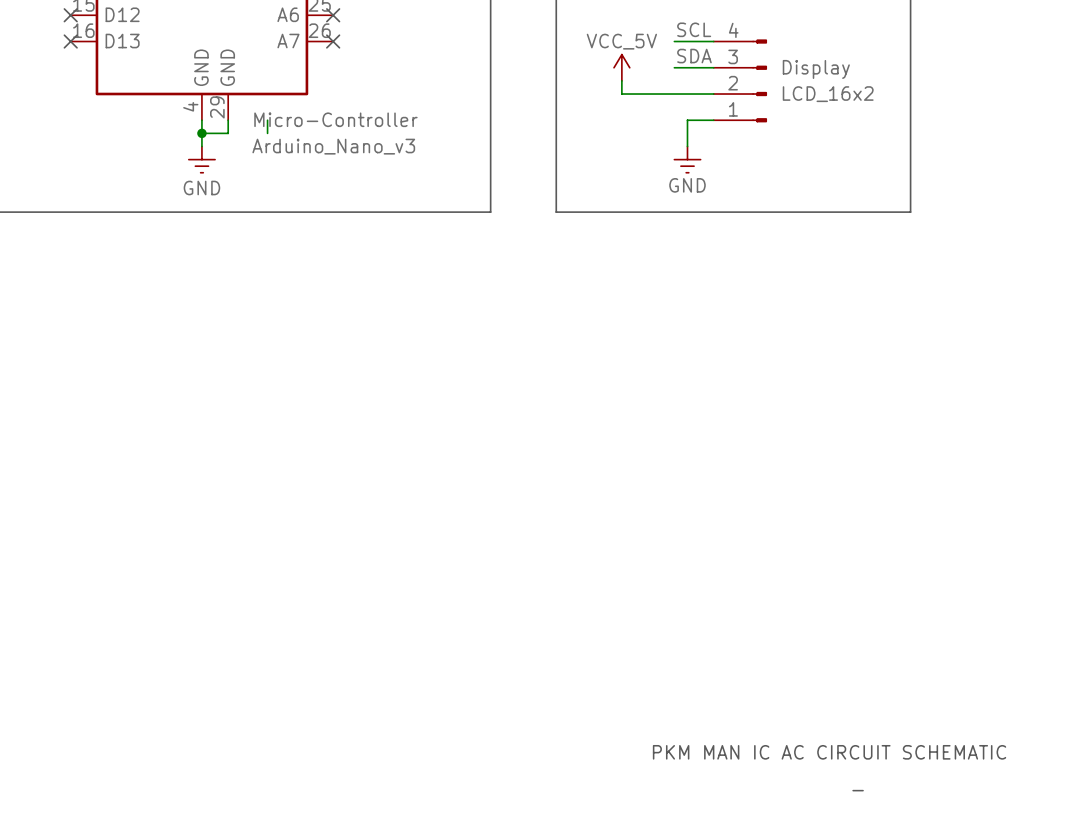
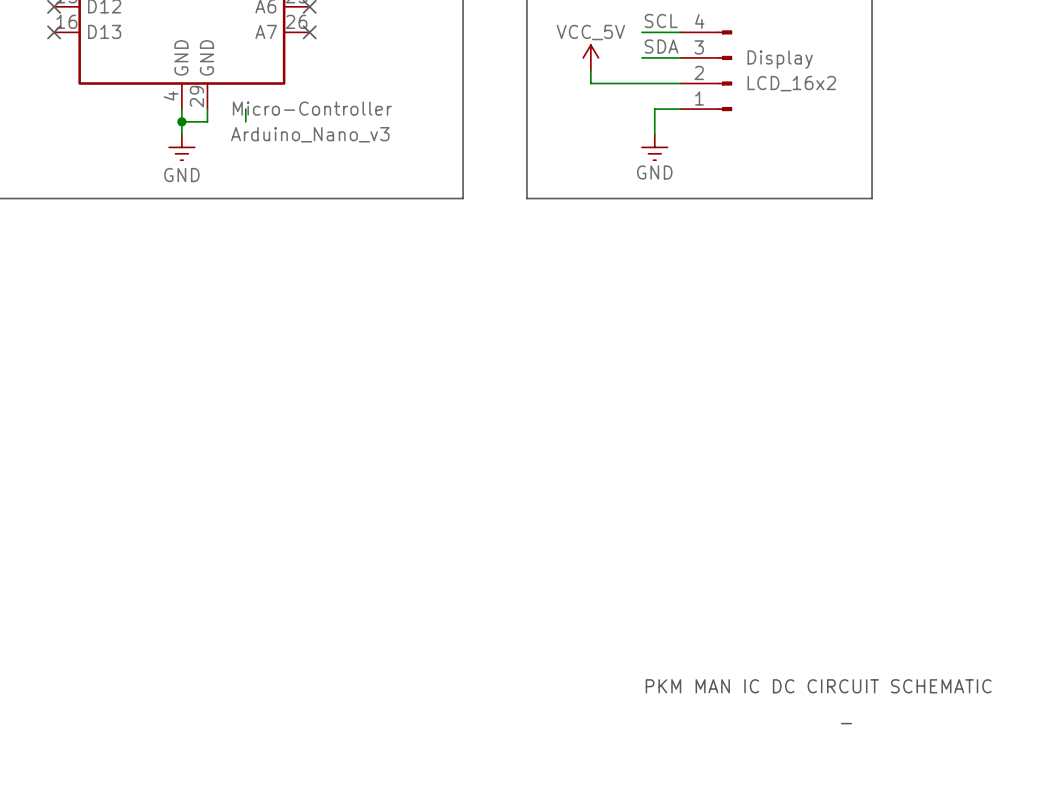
text: none -> PKM MAN IC DC CIRCUIT SCHEMATIC (818, 686)
text: PKM MAN IC AC CIRCUIT SCHEMATIC (829, 752) -> none
text position: - (858, 790) -> - (846, 723)

